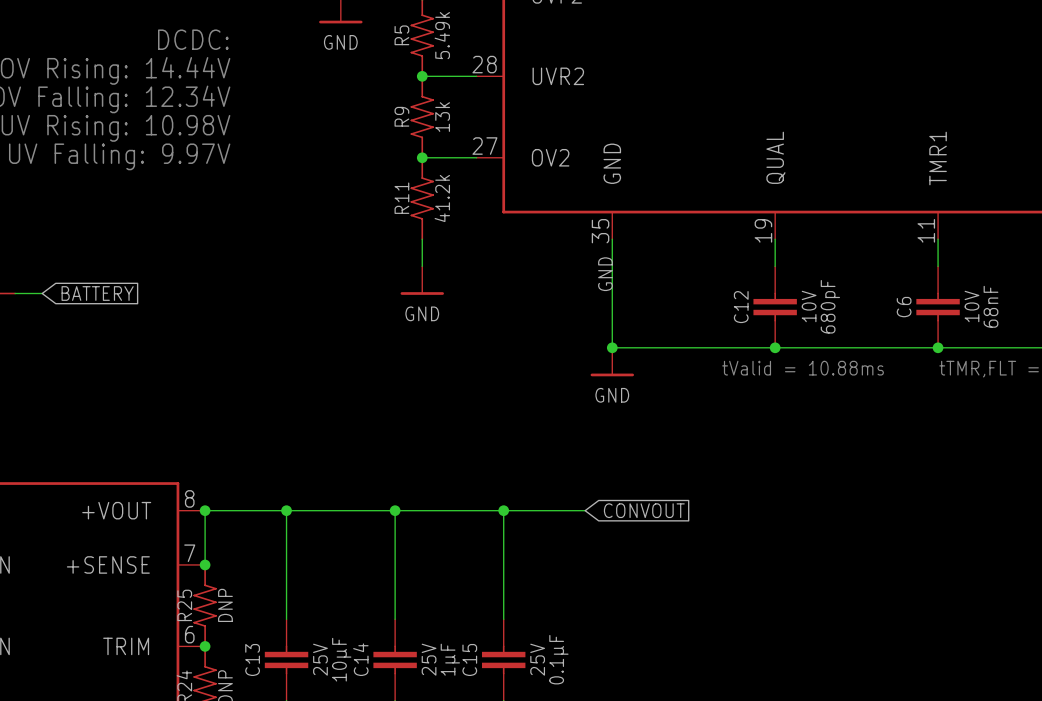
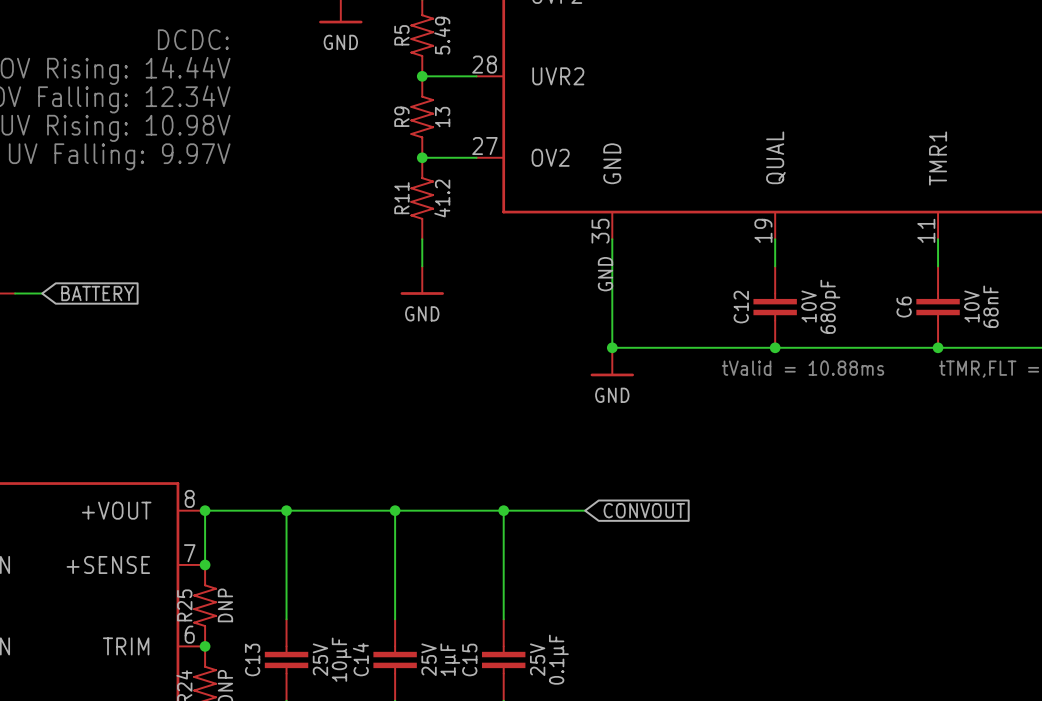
R5 text: 5.49k (442, 35) -> 5.49 (442, 35)
R9 text: 13k (442, 117) -> 13 (442, 117)
R11 text: 41.2k (442, 198) -> 41.2 (442, 198)

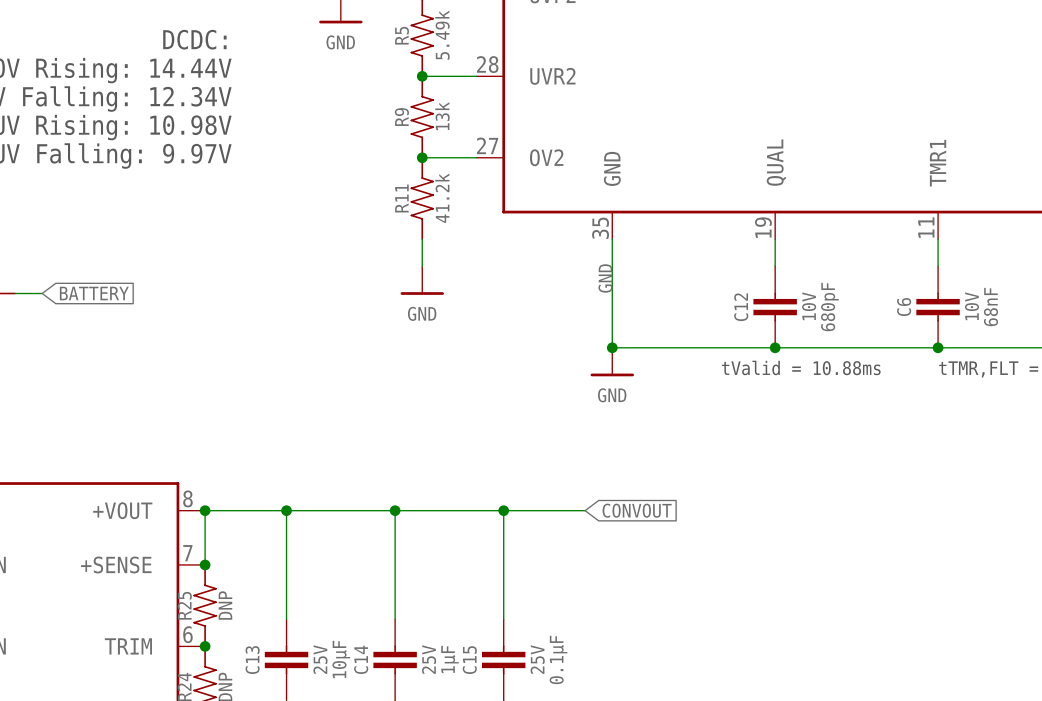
R5 text: 5.49 (442, 35) -> 5.49k (442, 35)
R9 text: 13 (442, 117) -> 13k (442, 116)
R11 text: 41.2 (442, 198) -> 41.2k (442, 198)

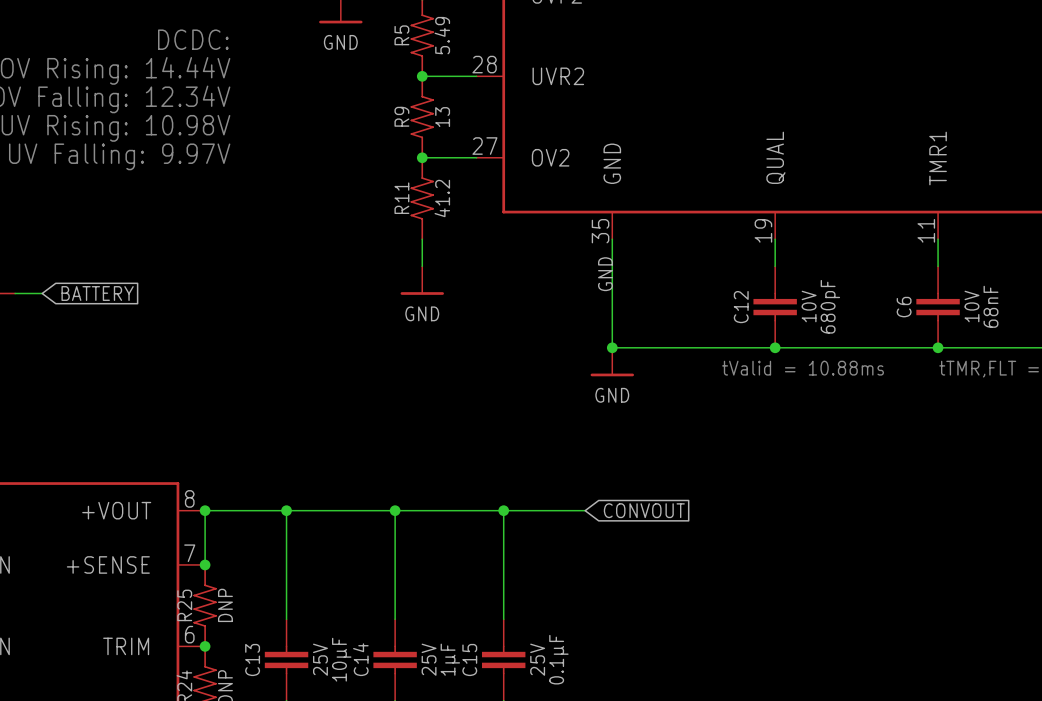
R5 text: 5.49k (442, 35) -> 5.49 (442, 35)
R9 text: 13k (442, 116) -> 13 (442, 117)
R11 text: 41.2k (442, 198) -> 41.2 (442, 198)

